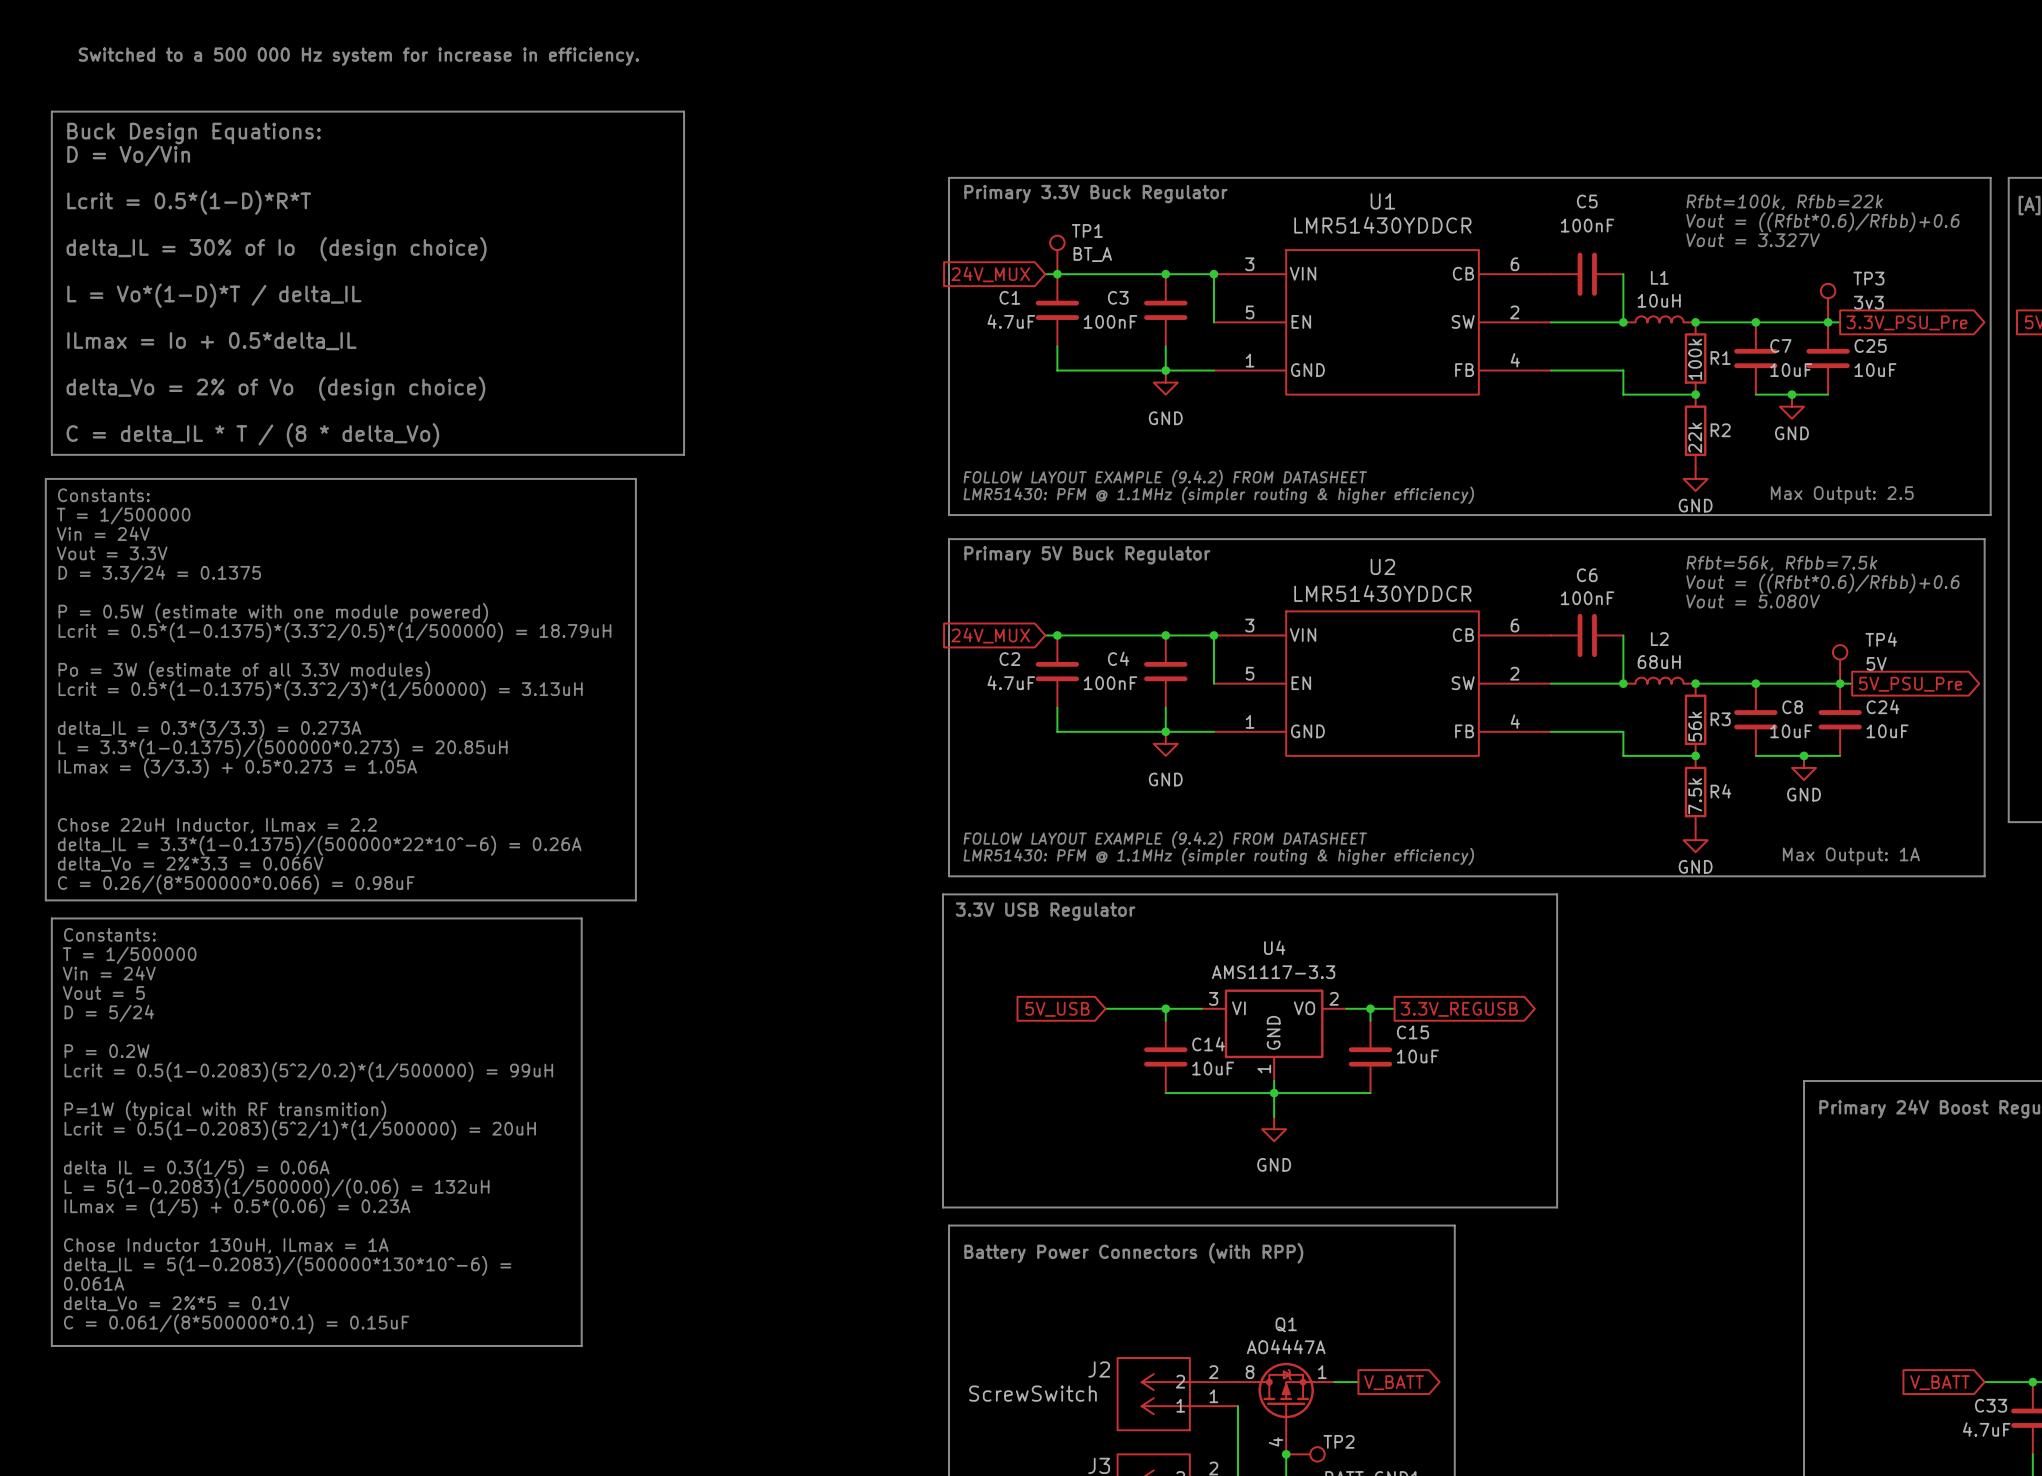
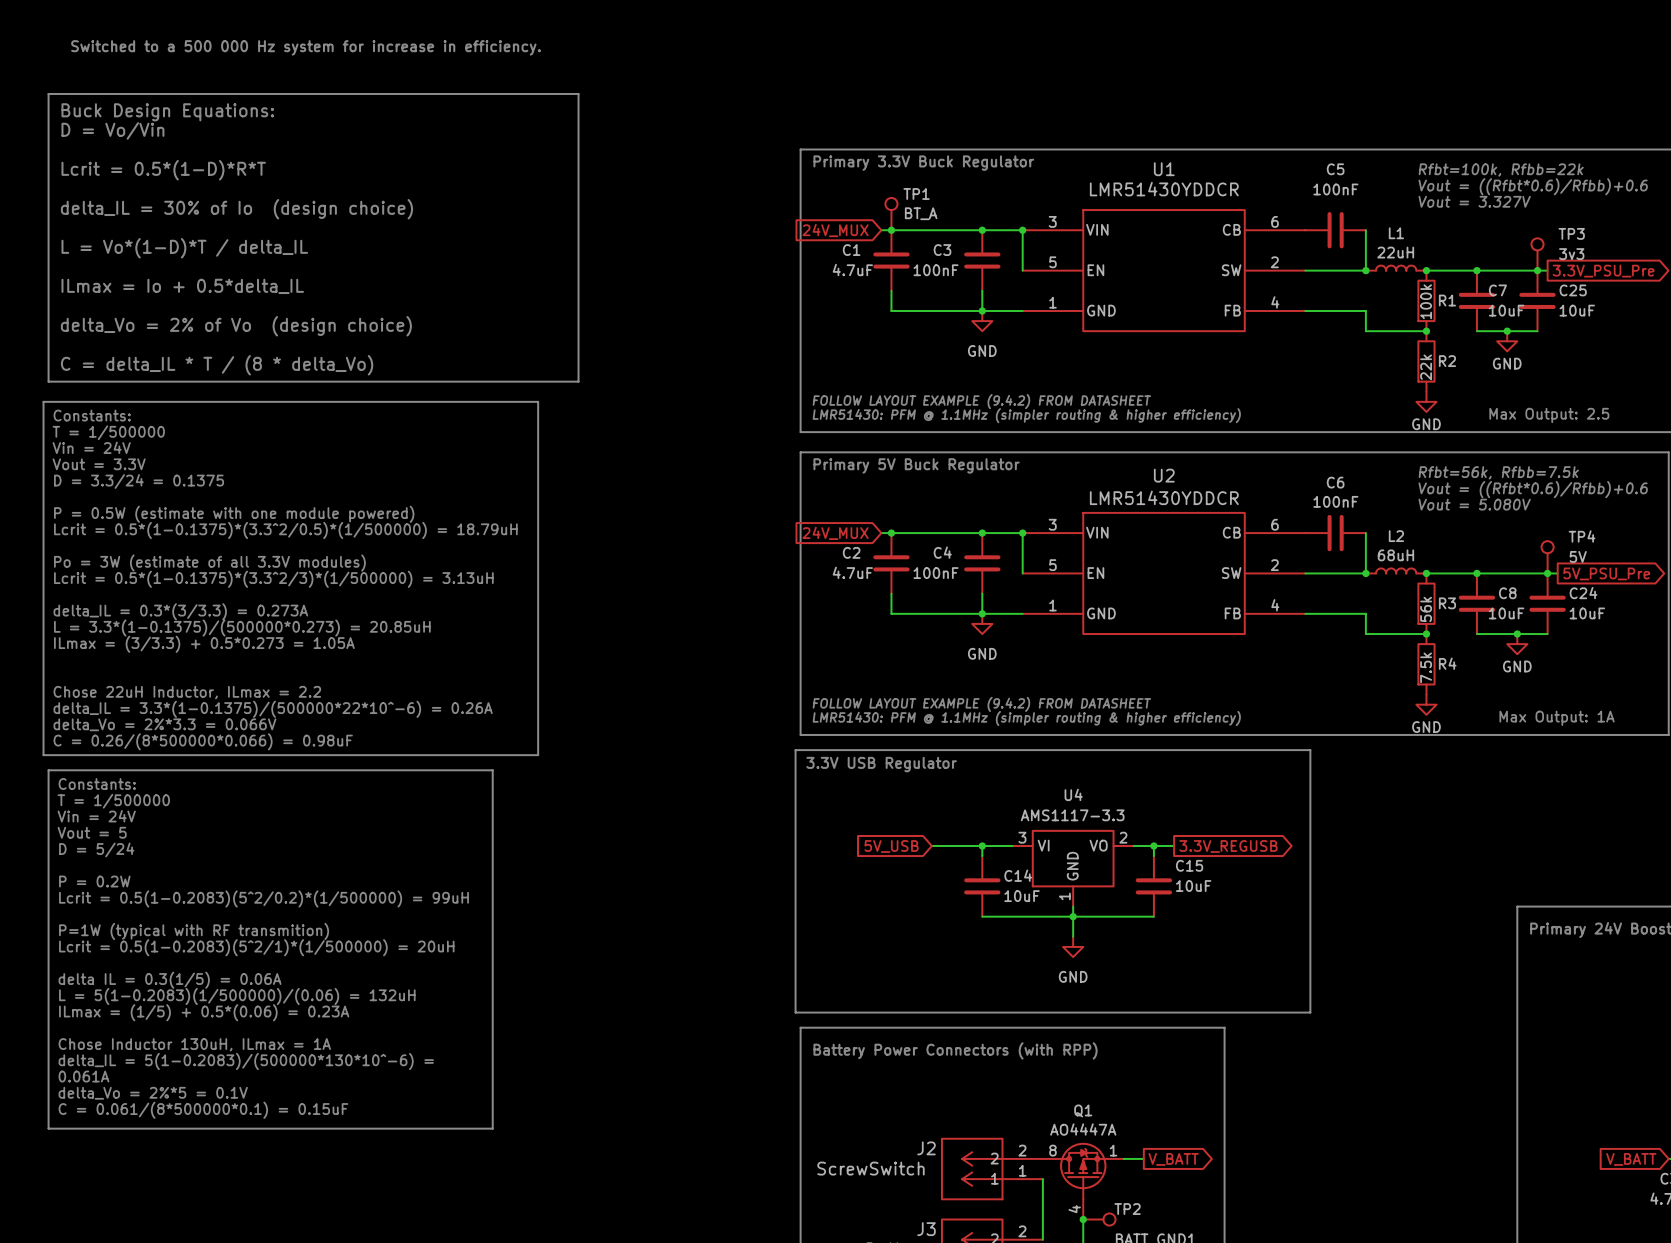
L1 value: 10uH (1659, 300) -> 22uH (1395, 252)

